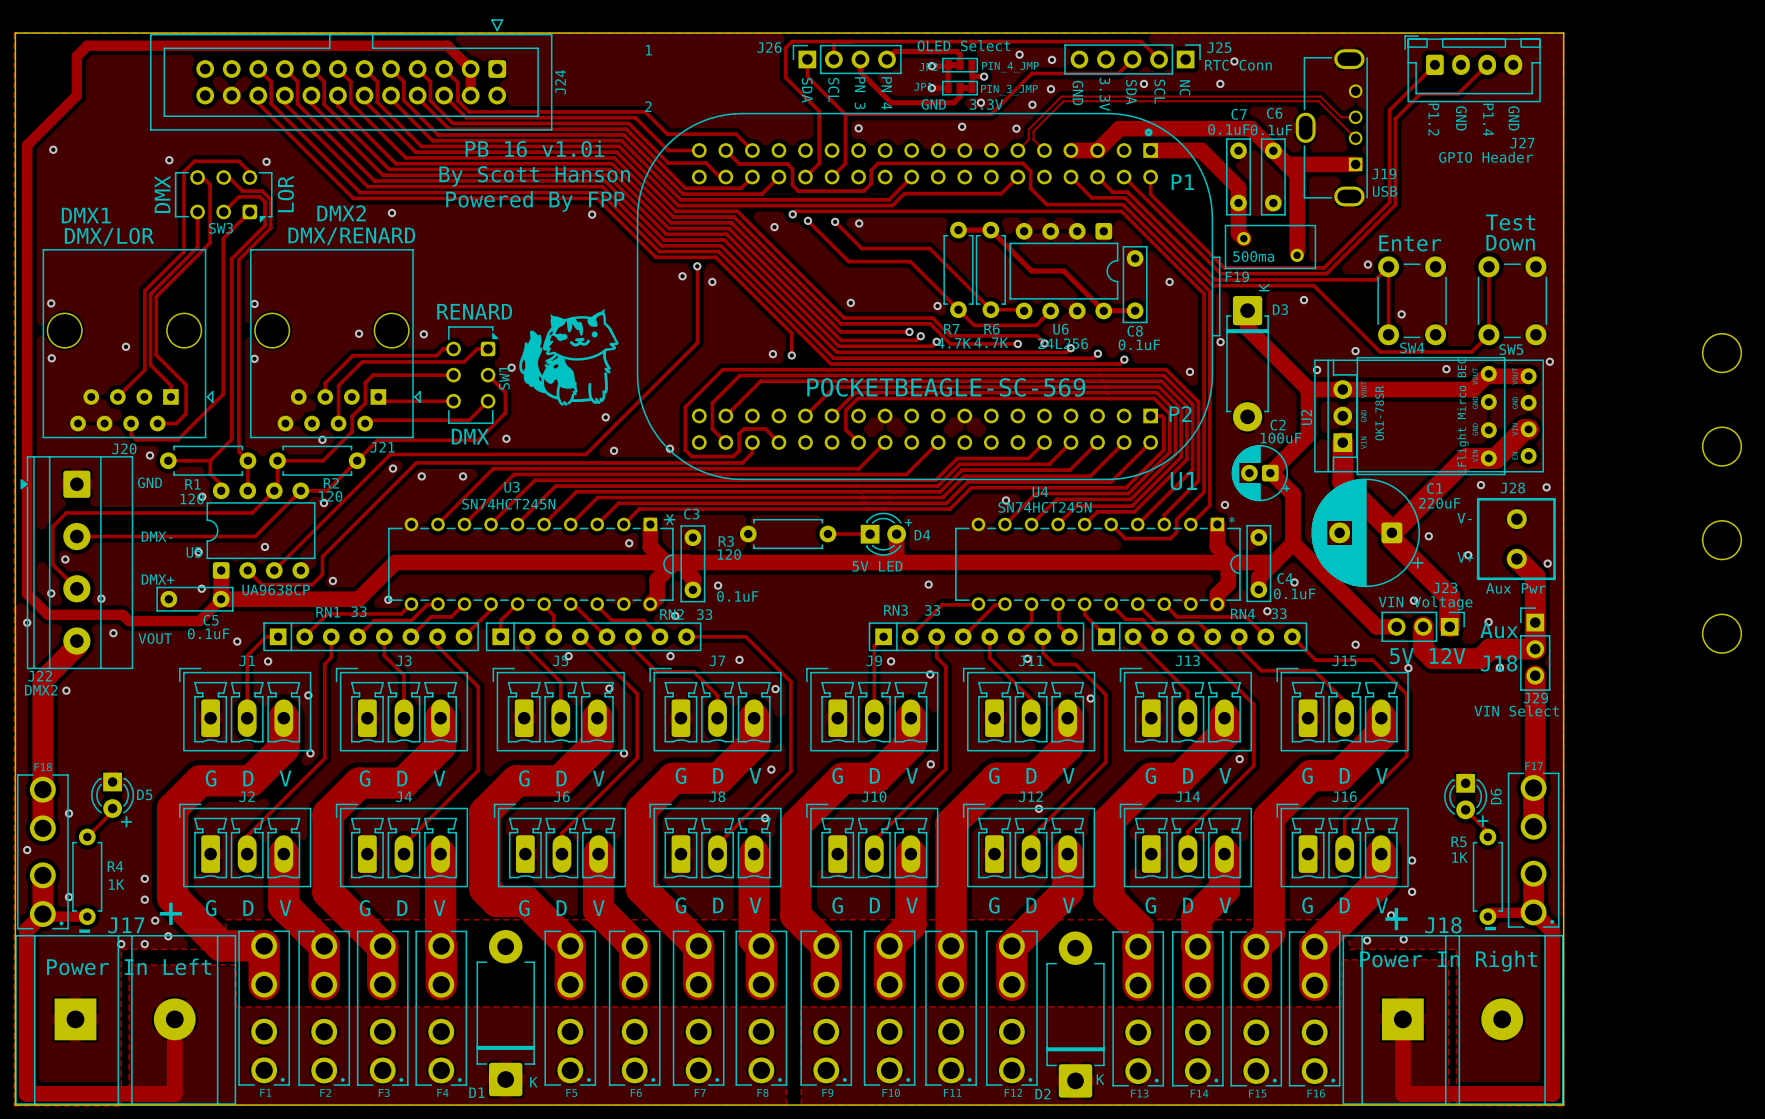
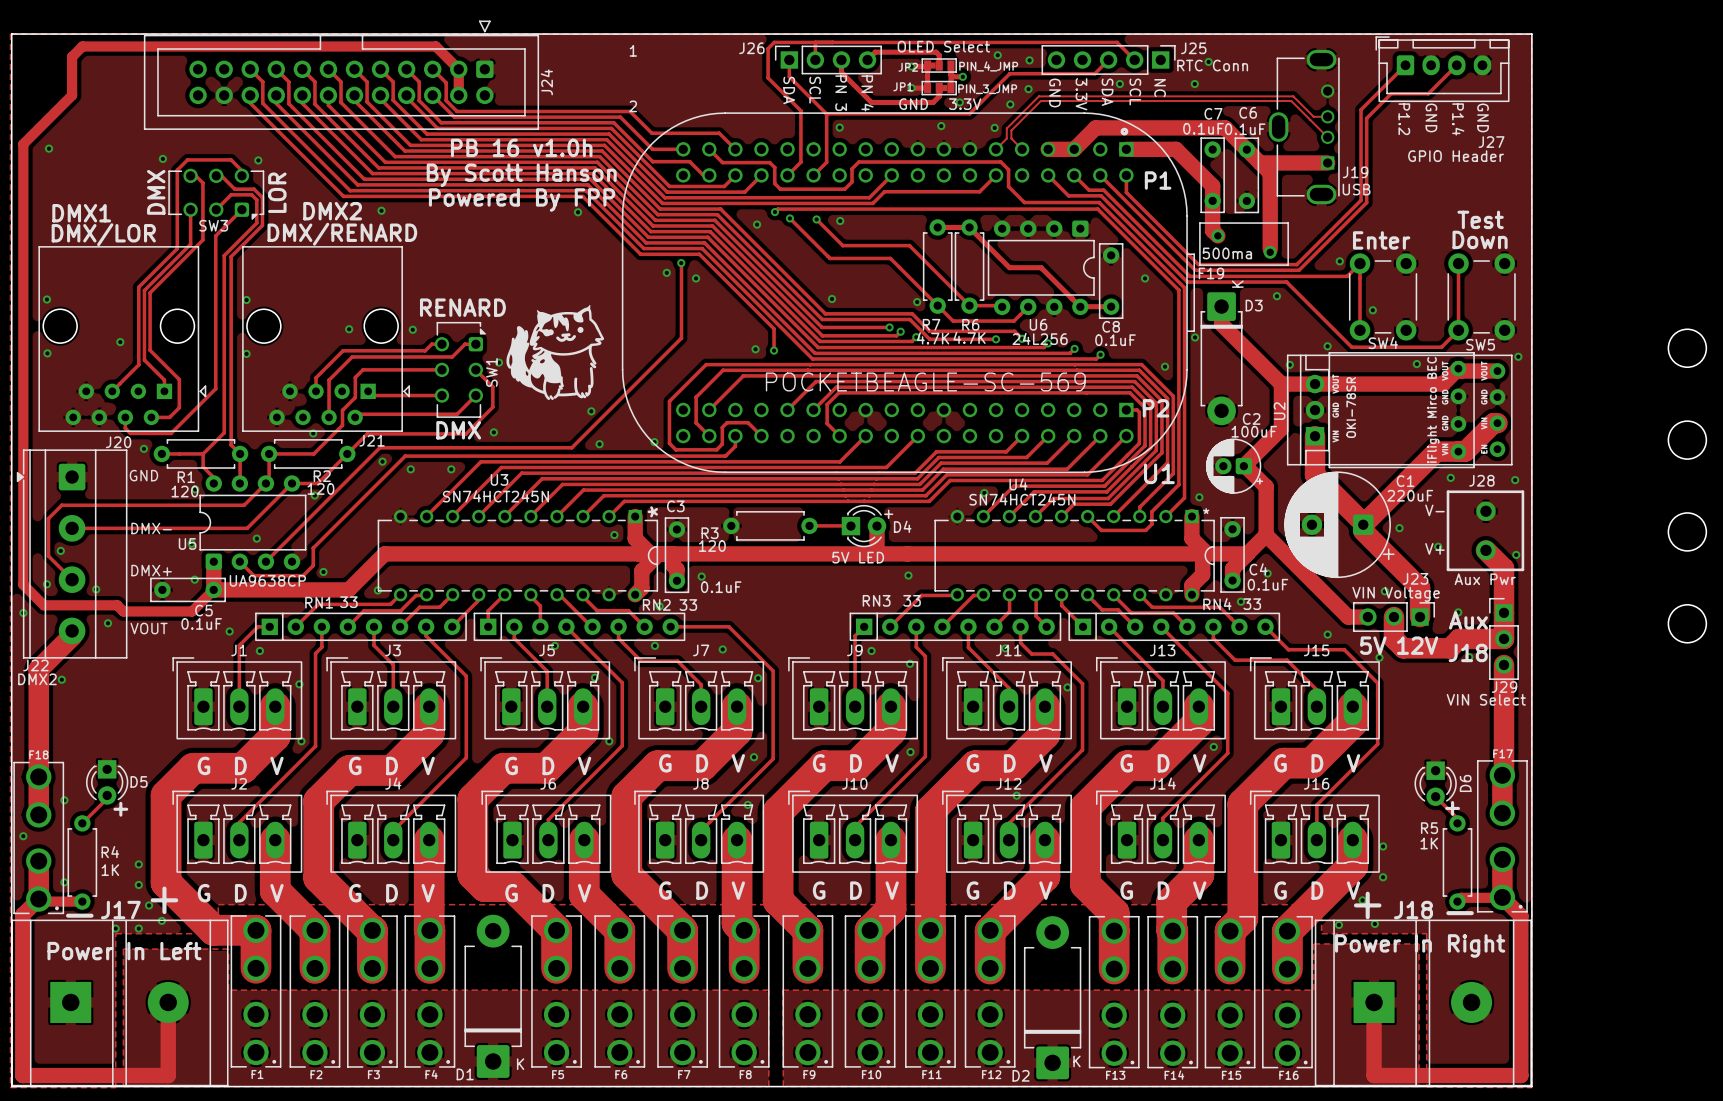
text: PB 16 v1.0i (535, 148) -> PB 16 v1.0h (521, 147)

